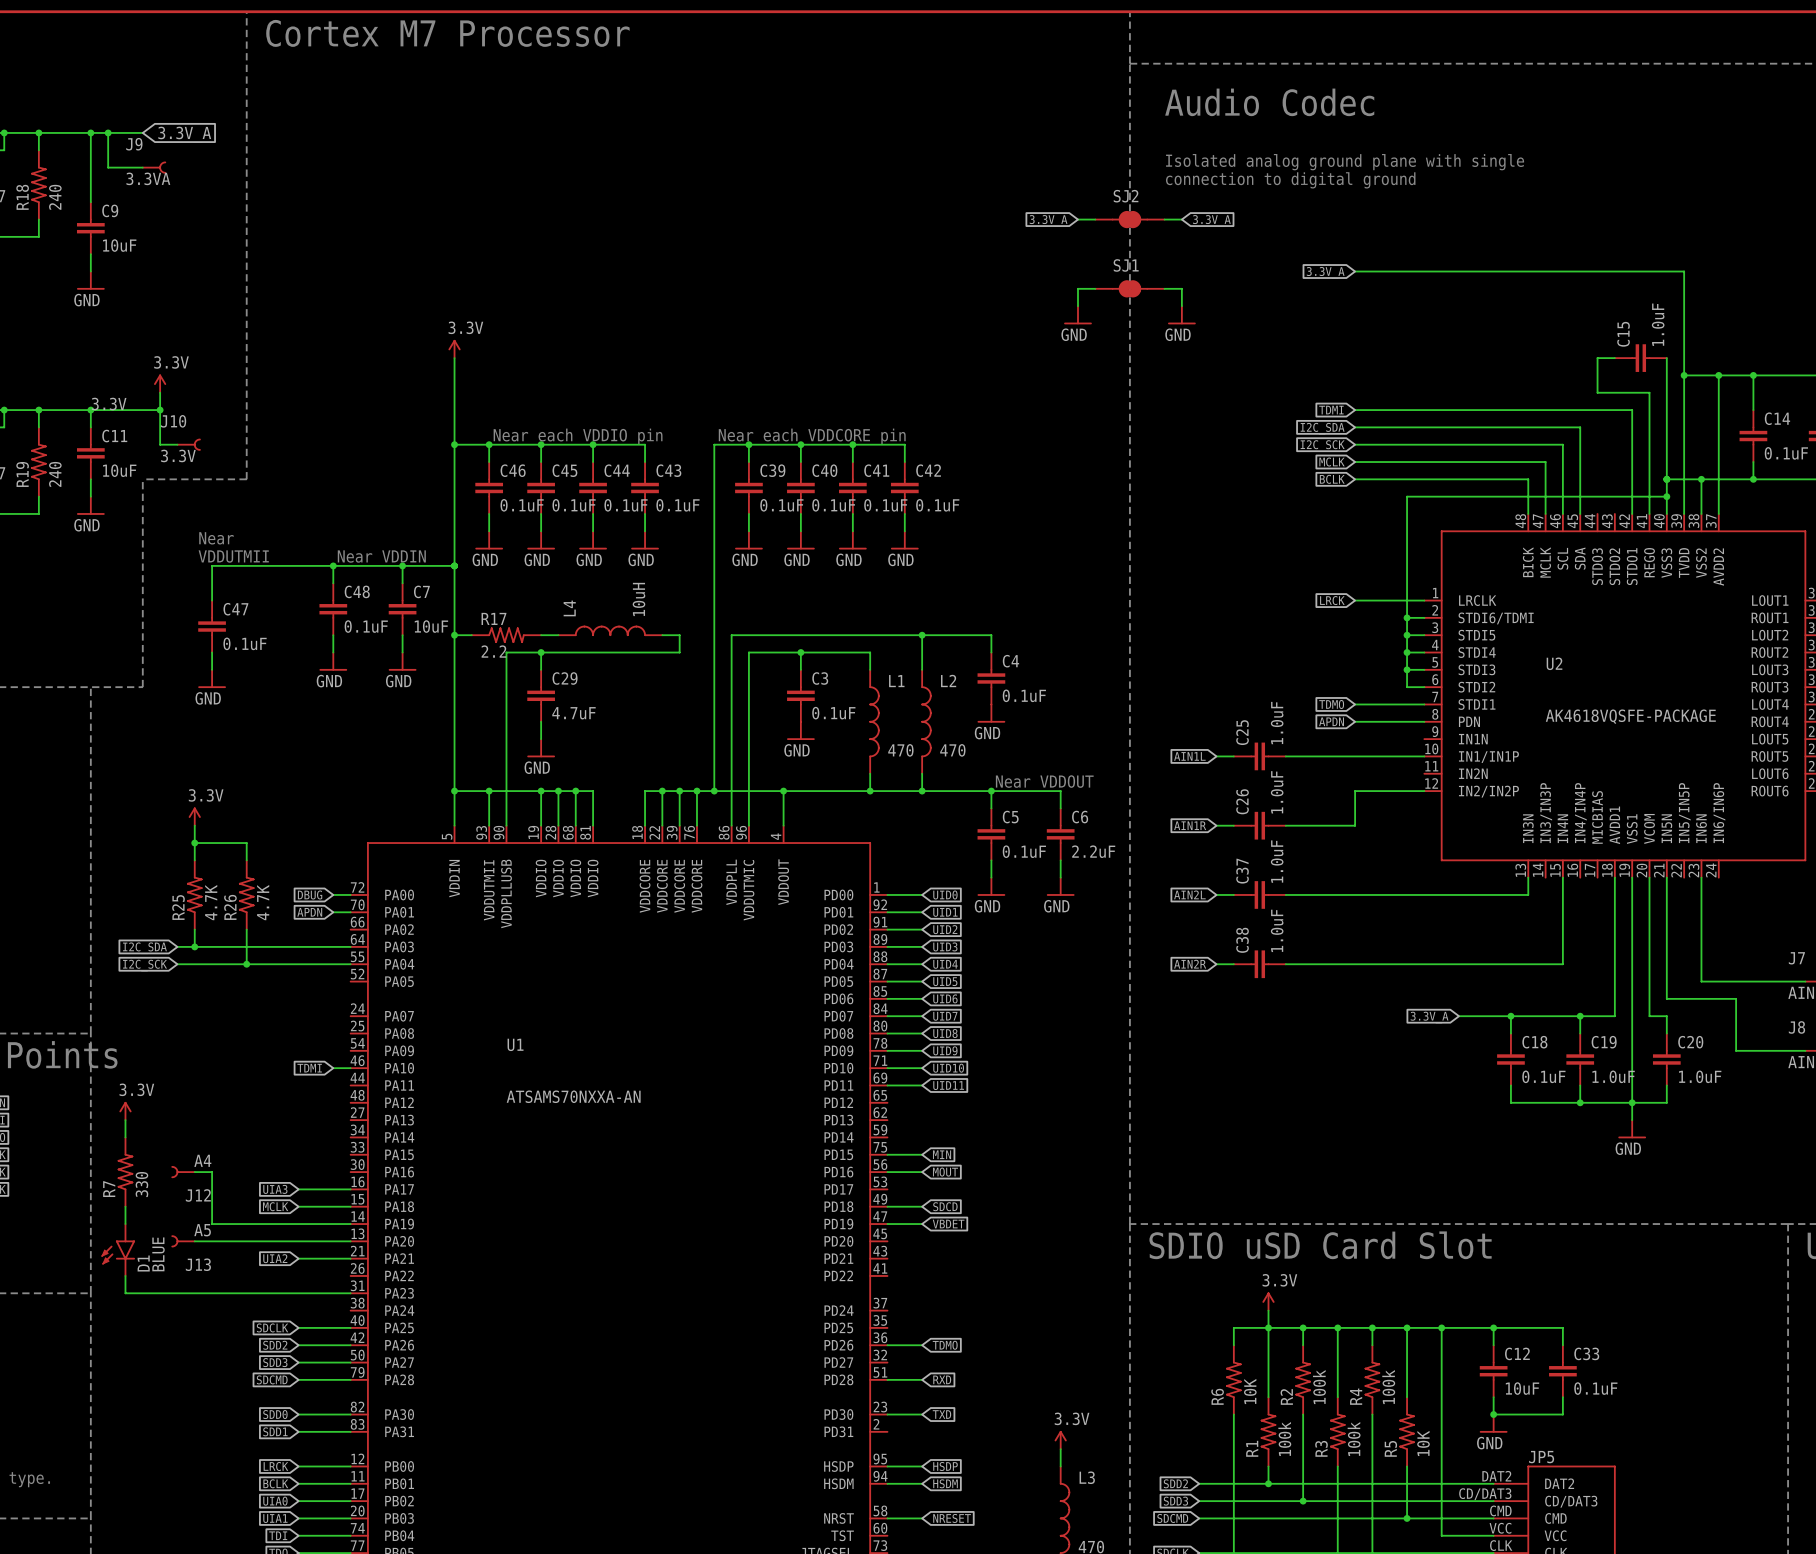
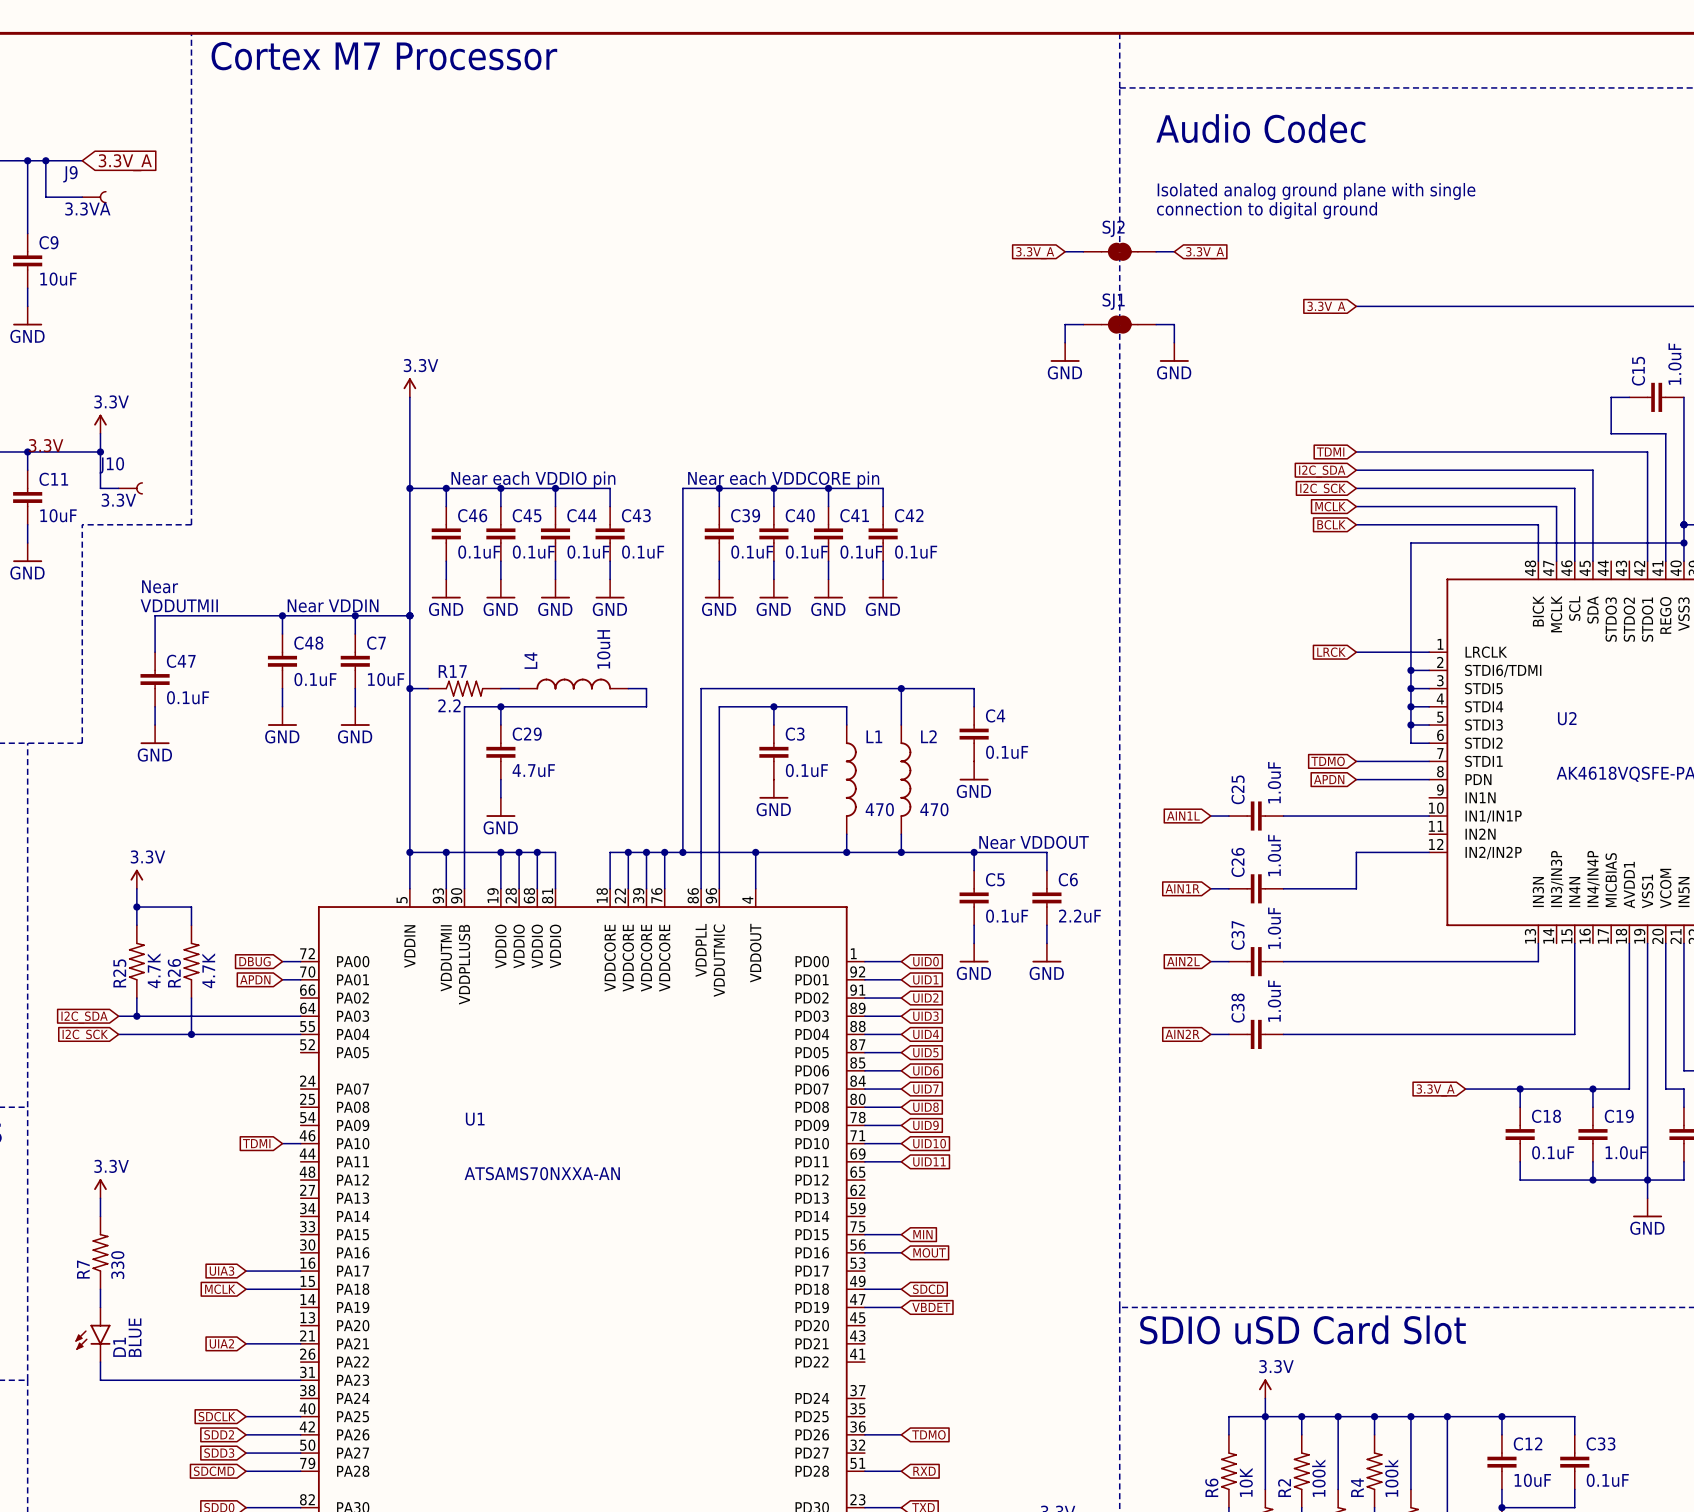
power symbol position: 3.3V (125, 1111) -> 3.3V (100, 1188)
wire: (125, 1120) (125, 1137) -> (100, 1198) (100, 1216)
R7 position: (125, 1172) -> (100, 1252)
J12: A4 (183, 1172) -> none
wire: (194, 1172) (212, 1172) (212, 1224) (350, 1224) -> none
wire: (125, 1206) (125, 1224) -> (100, 1289) (100, 1307)
J13: A5 (183, 1241) -> none
wire: (194, 1241) (350, 1241) -> none
D1 position: (118, 1250) -> (92, 1334)
wire: (125, 1275) (125, 1293) (160, 1293) -> (100, 1362) (100, 1380)

